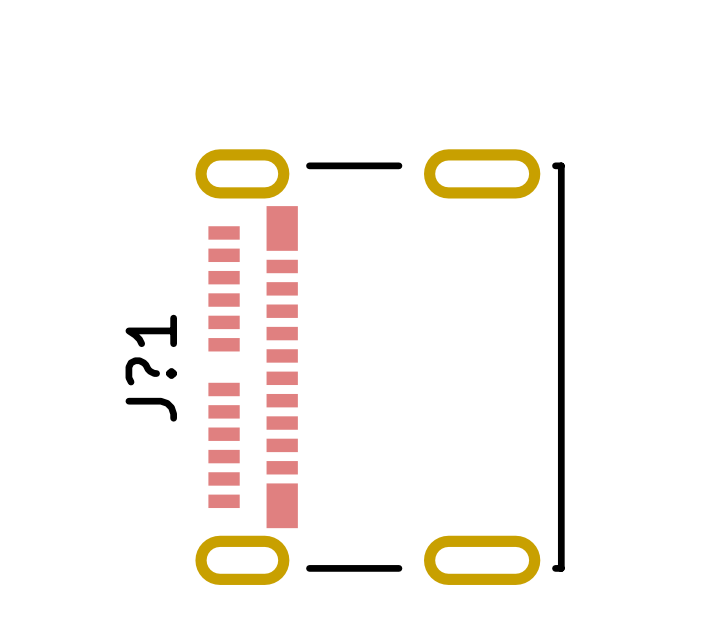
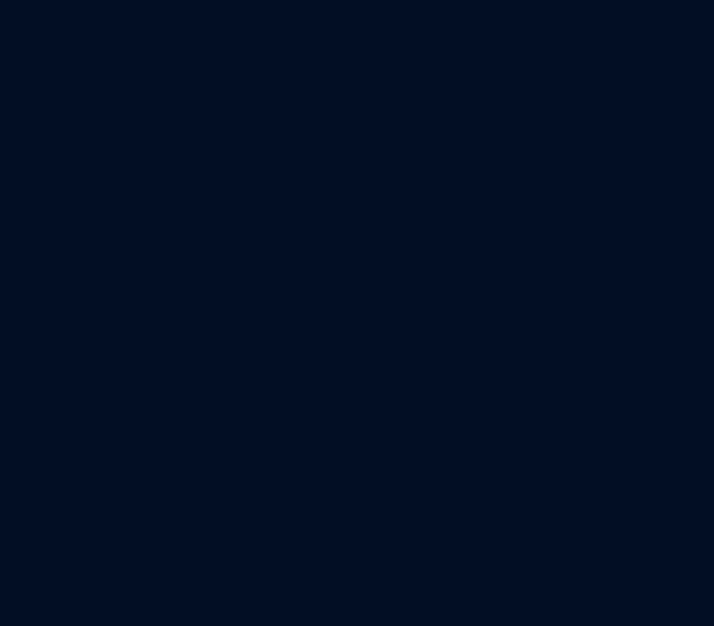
J?1: (380, 367) -> none

